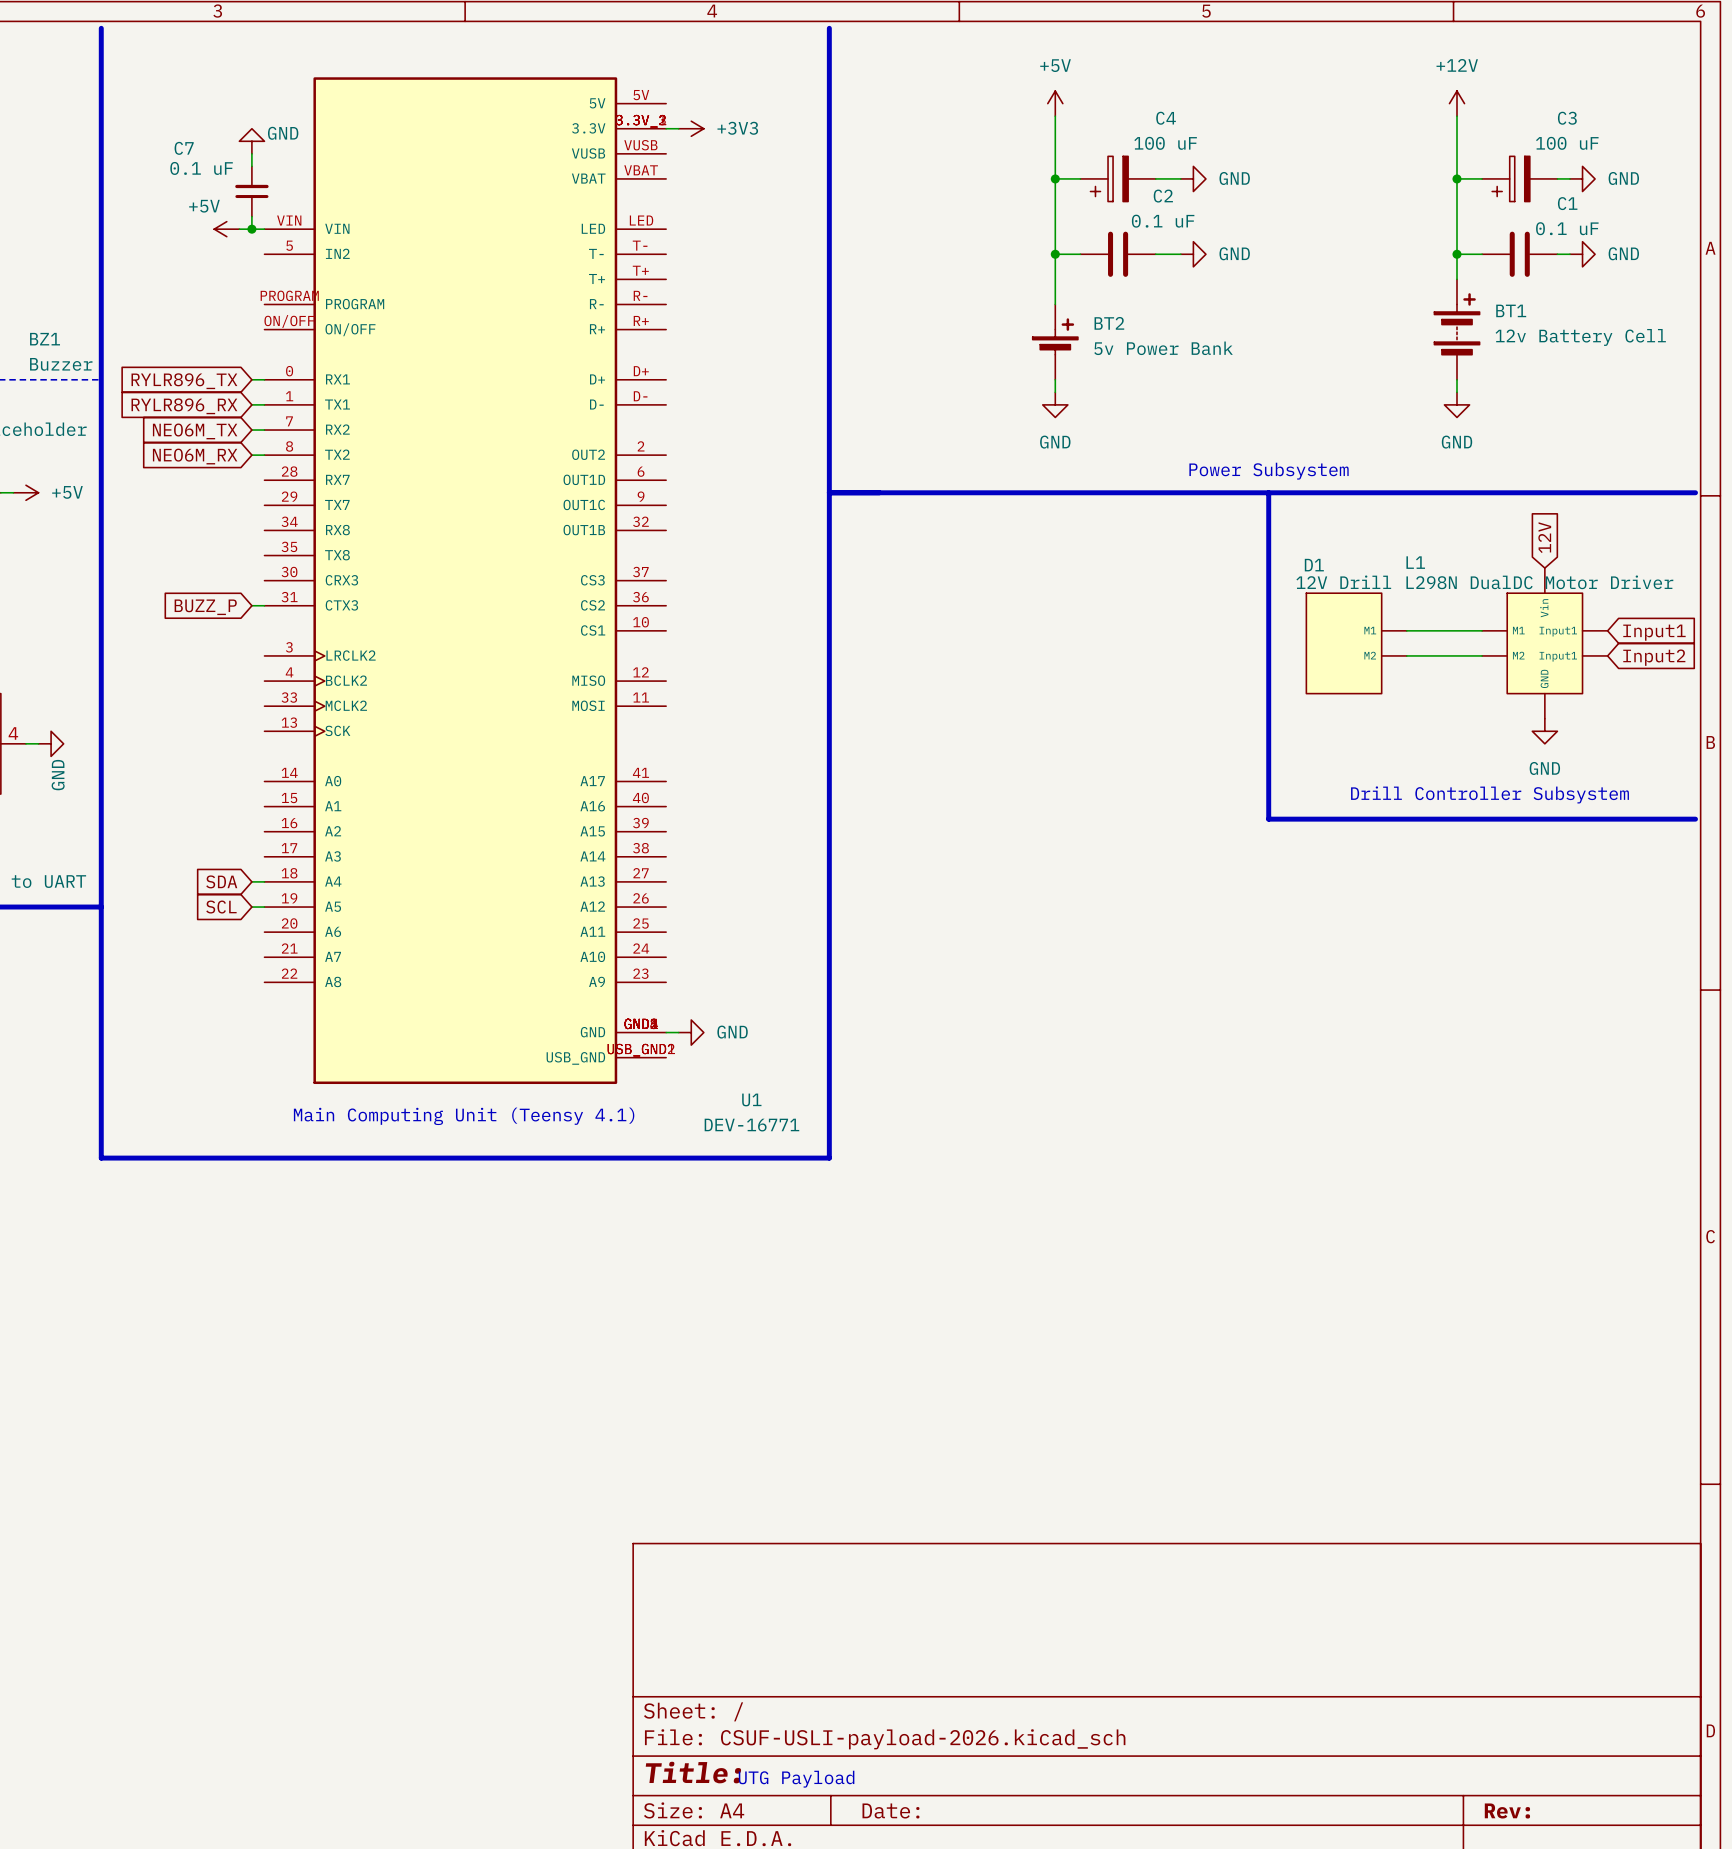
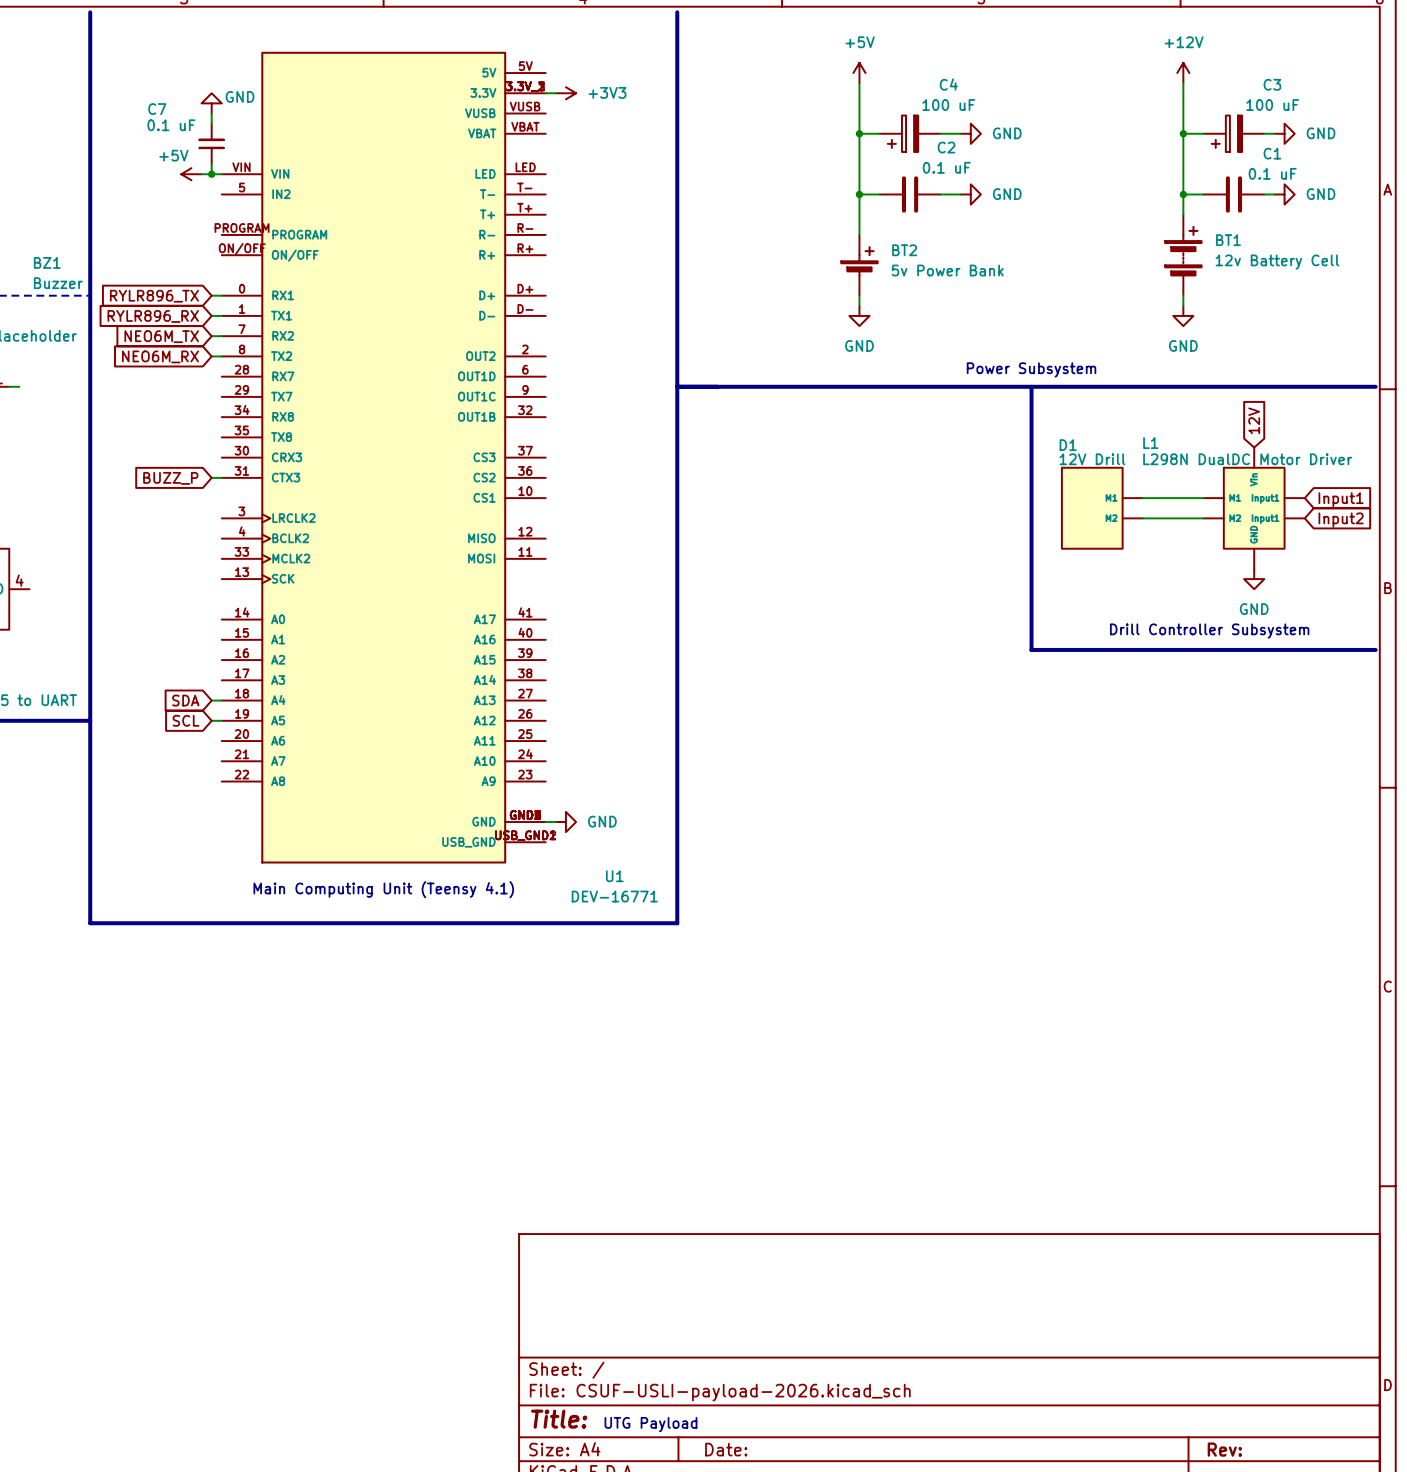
power symbol: +5V (25, 492) -> none
wire: (25, 743) (38, 743) -> none
power symbol: GND (51, 743) -> none

